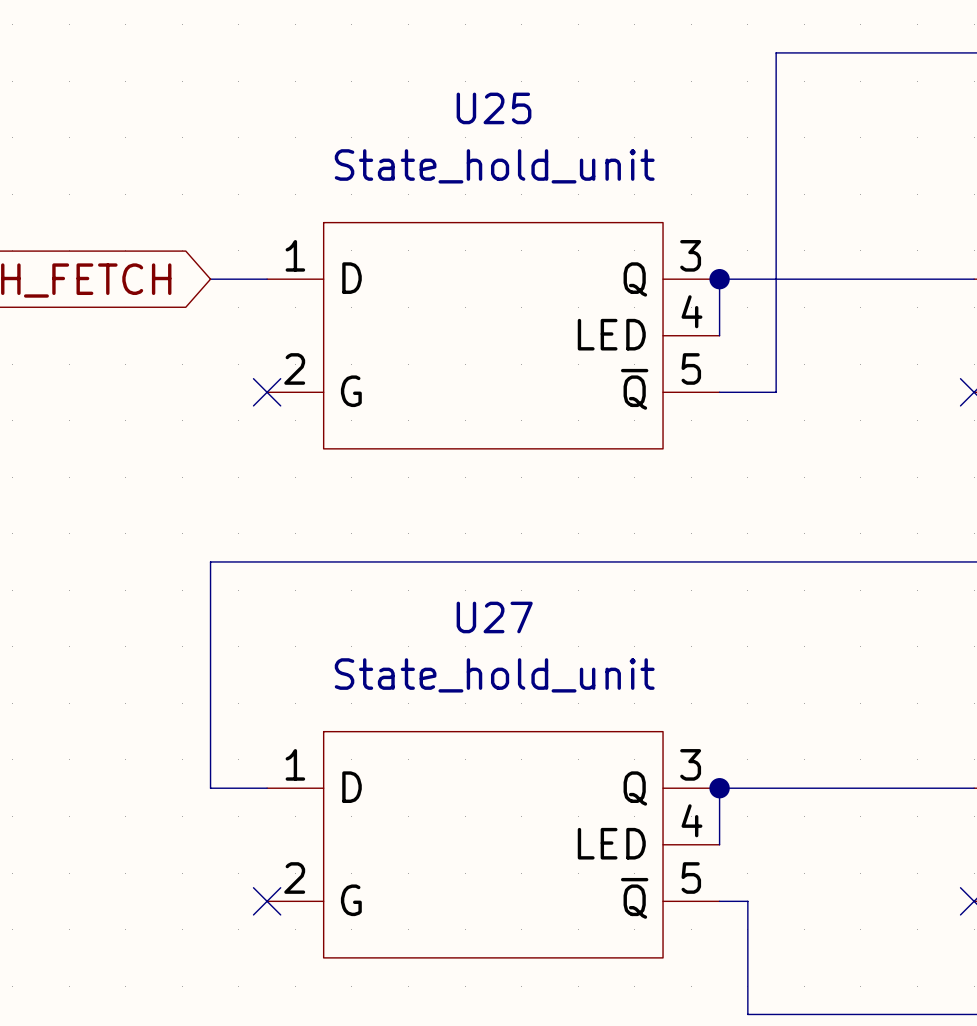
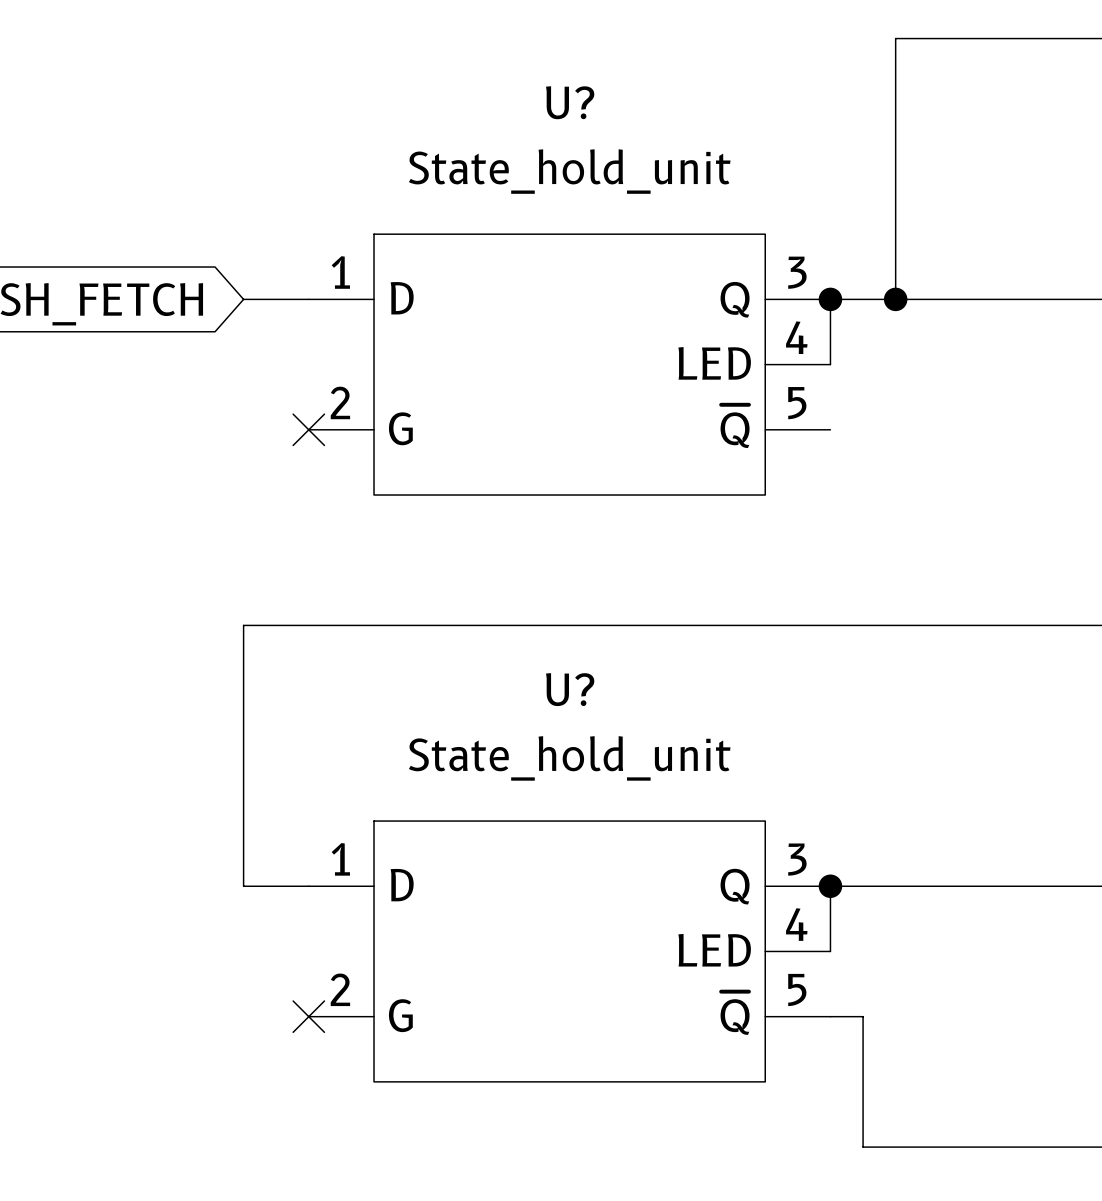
U25 name: U25 (494, 108) -> U? (570, 102)
wire: (776, 279) (776, 392) (719, 392) -> none
junction: none -> (895, 299)
U27 name: U27 (494, 617) -> U? (570, 689)

